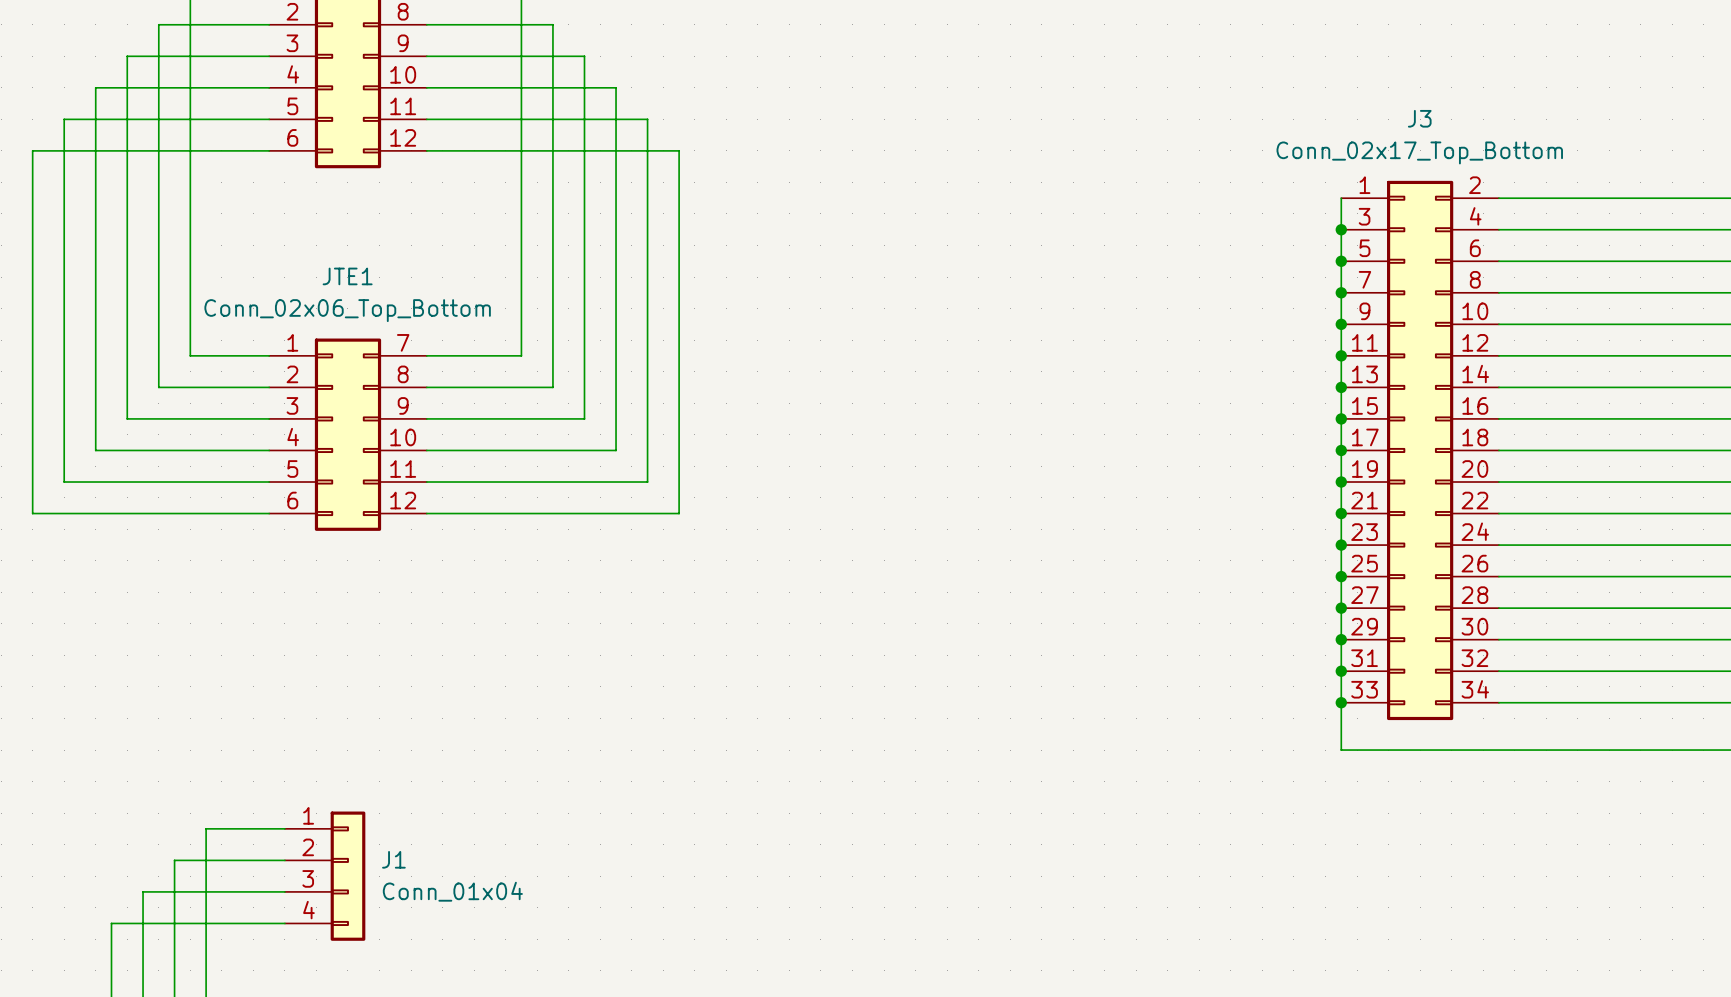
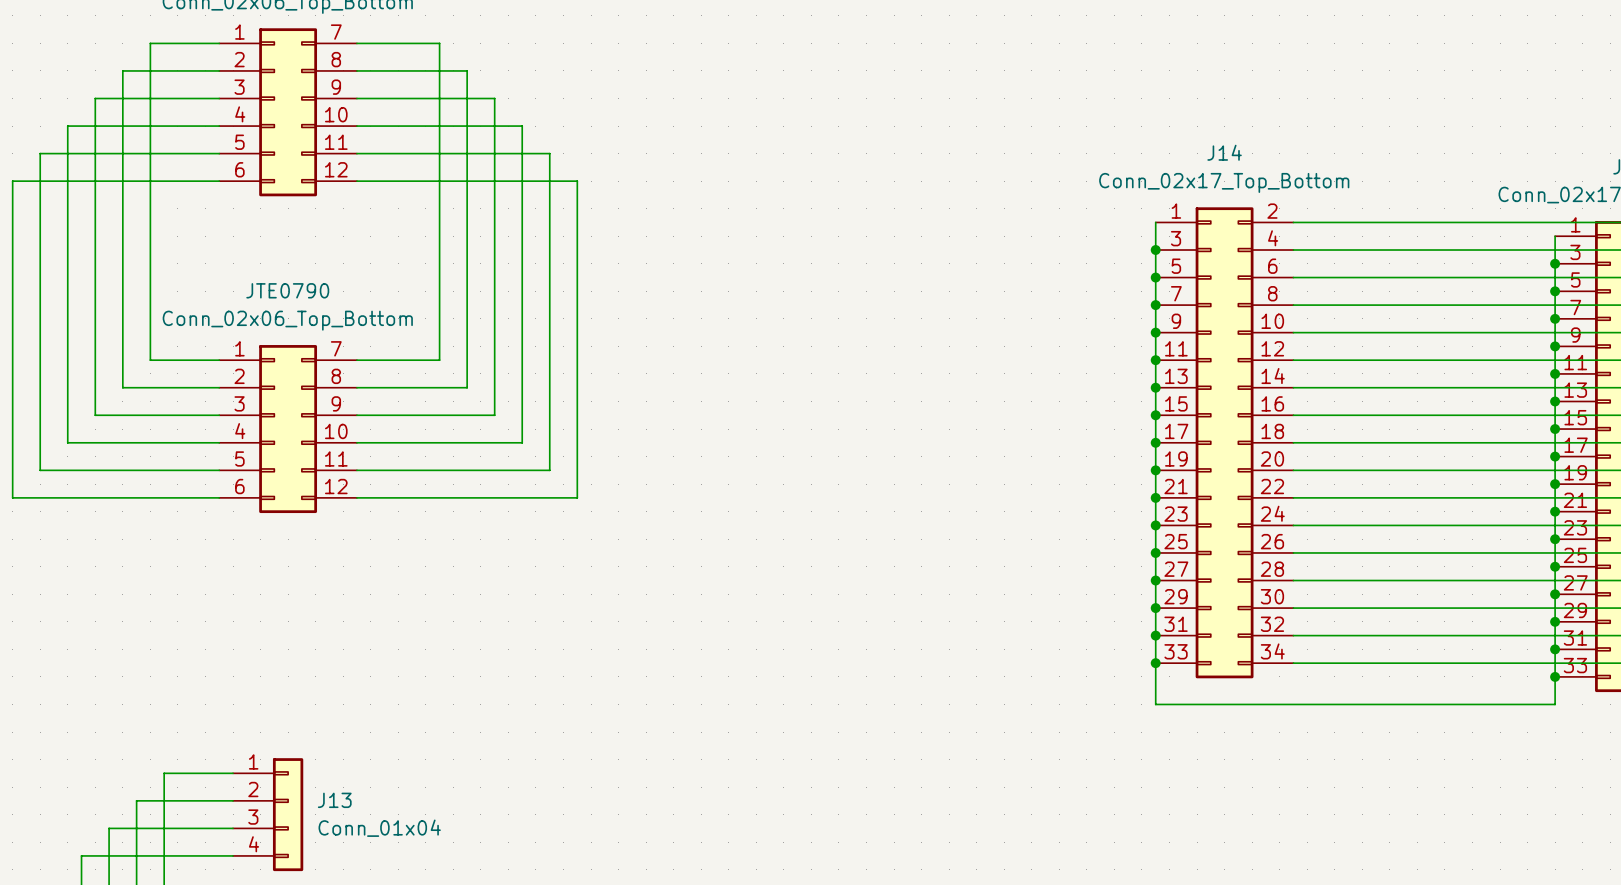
J3 name: J3 (1419, 118) -> J14 (1224, 152)
JTE1 name: JTE1 (347, 276) -> JTE0790 (287, 290)
J1 name: J1 (393, 859) -> J13 (334, 800)

